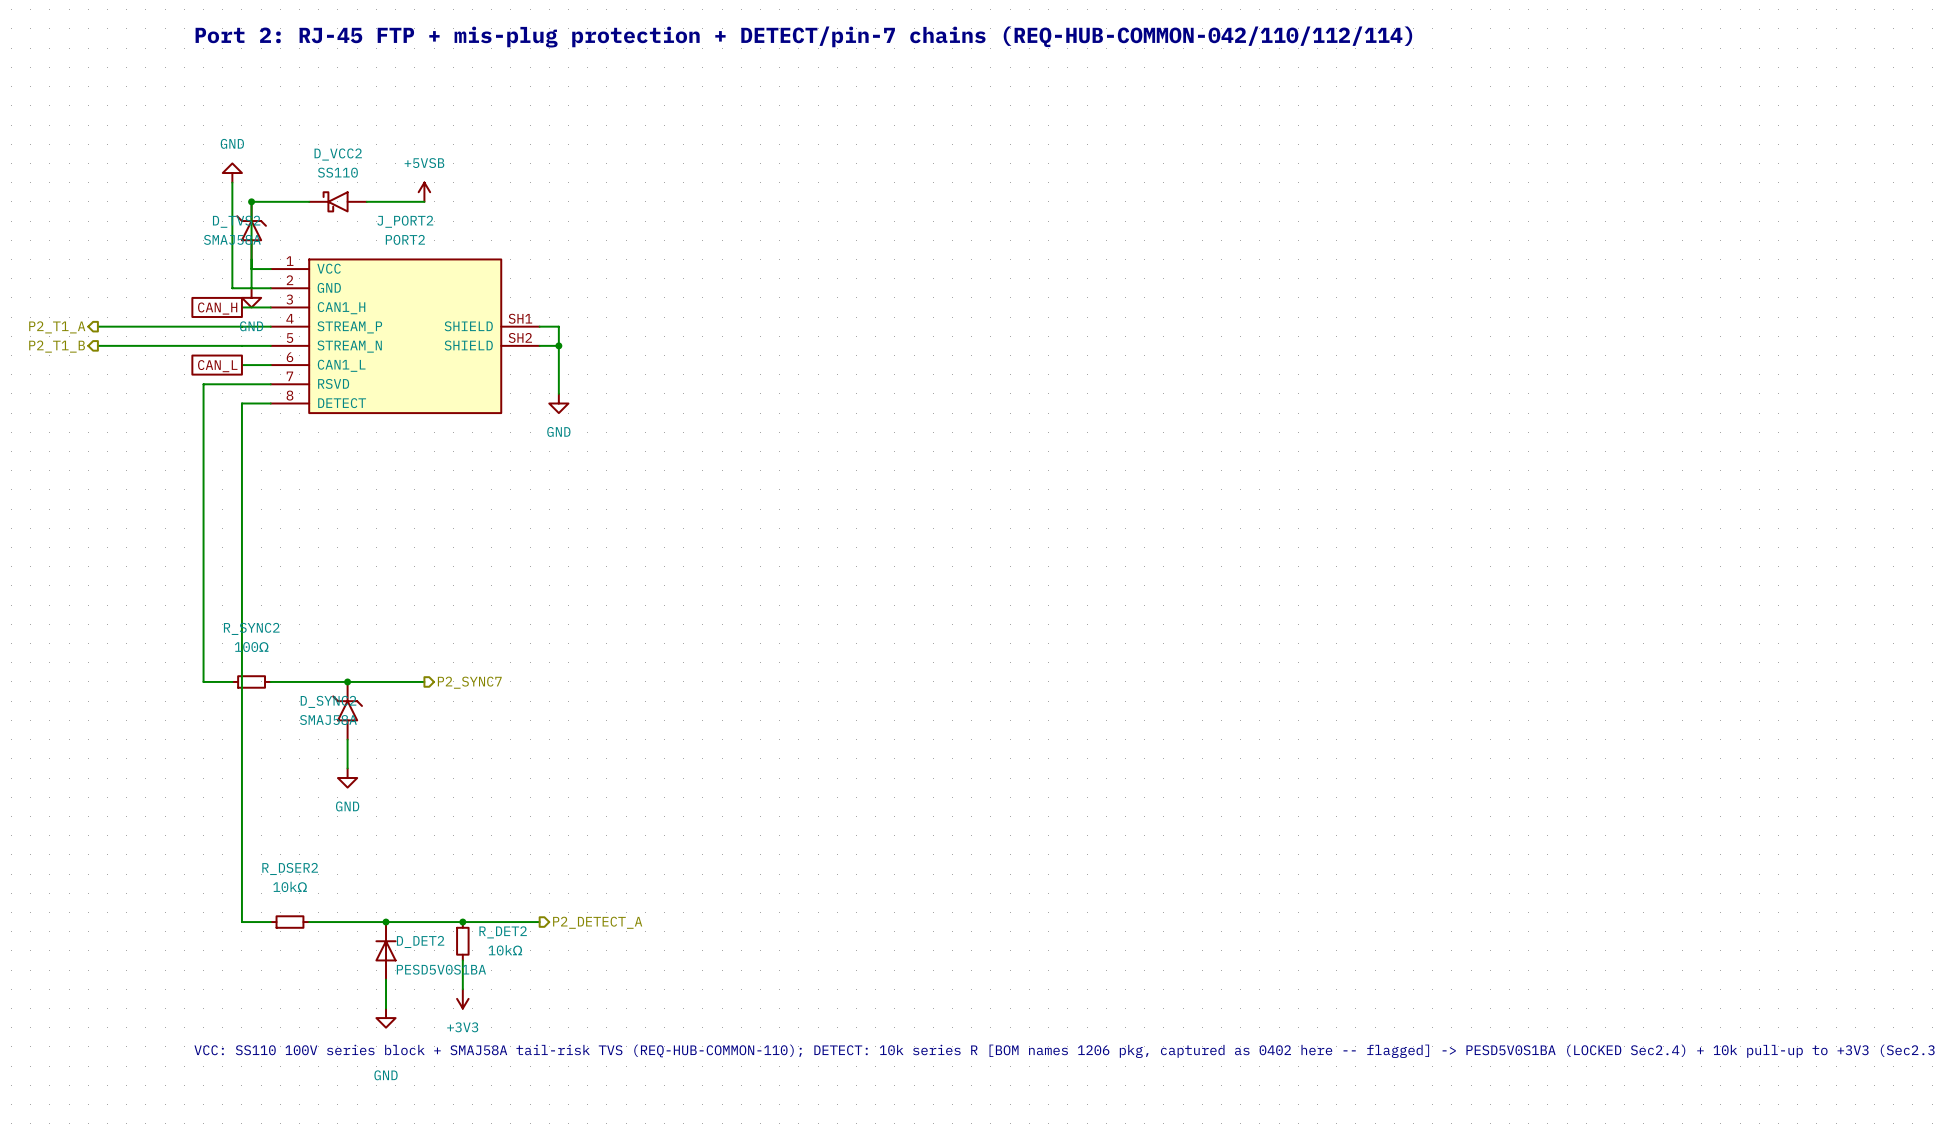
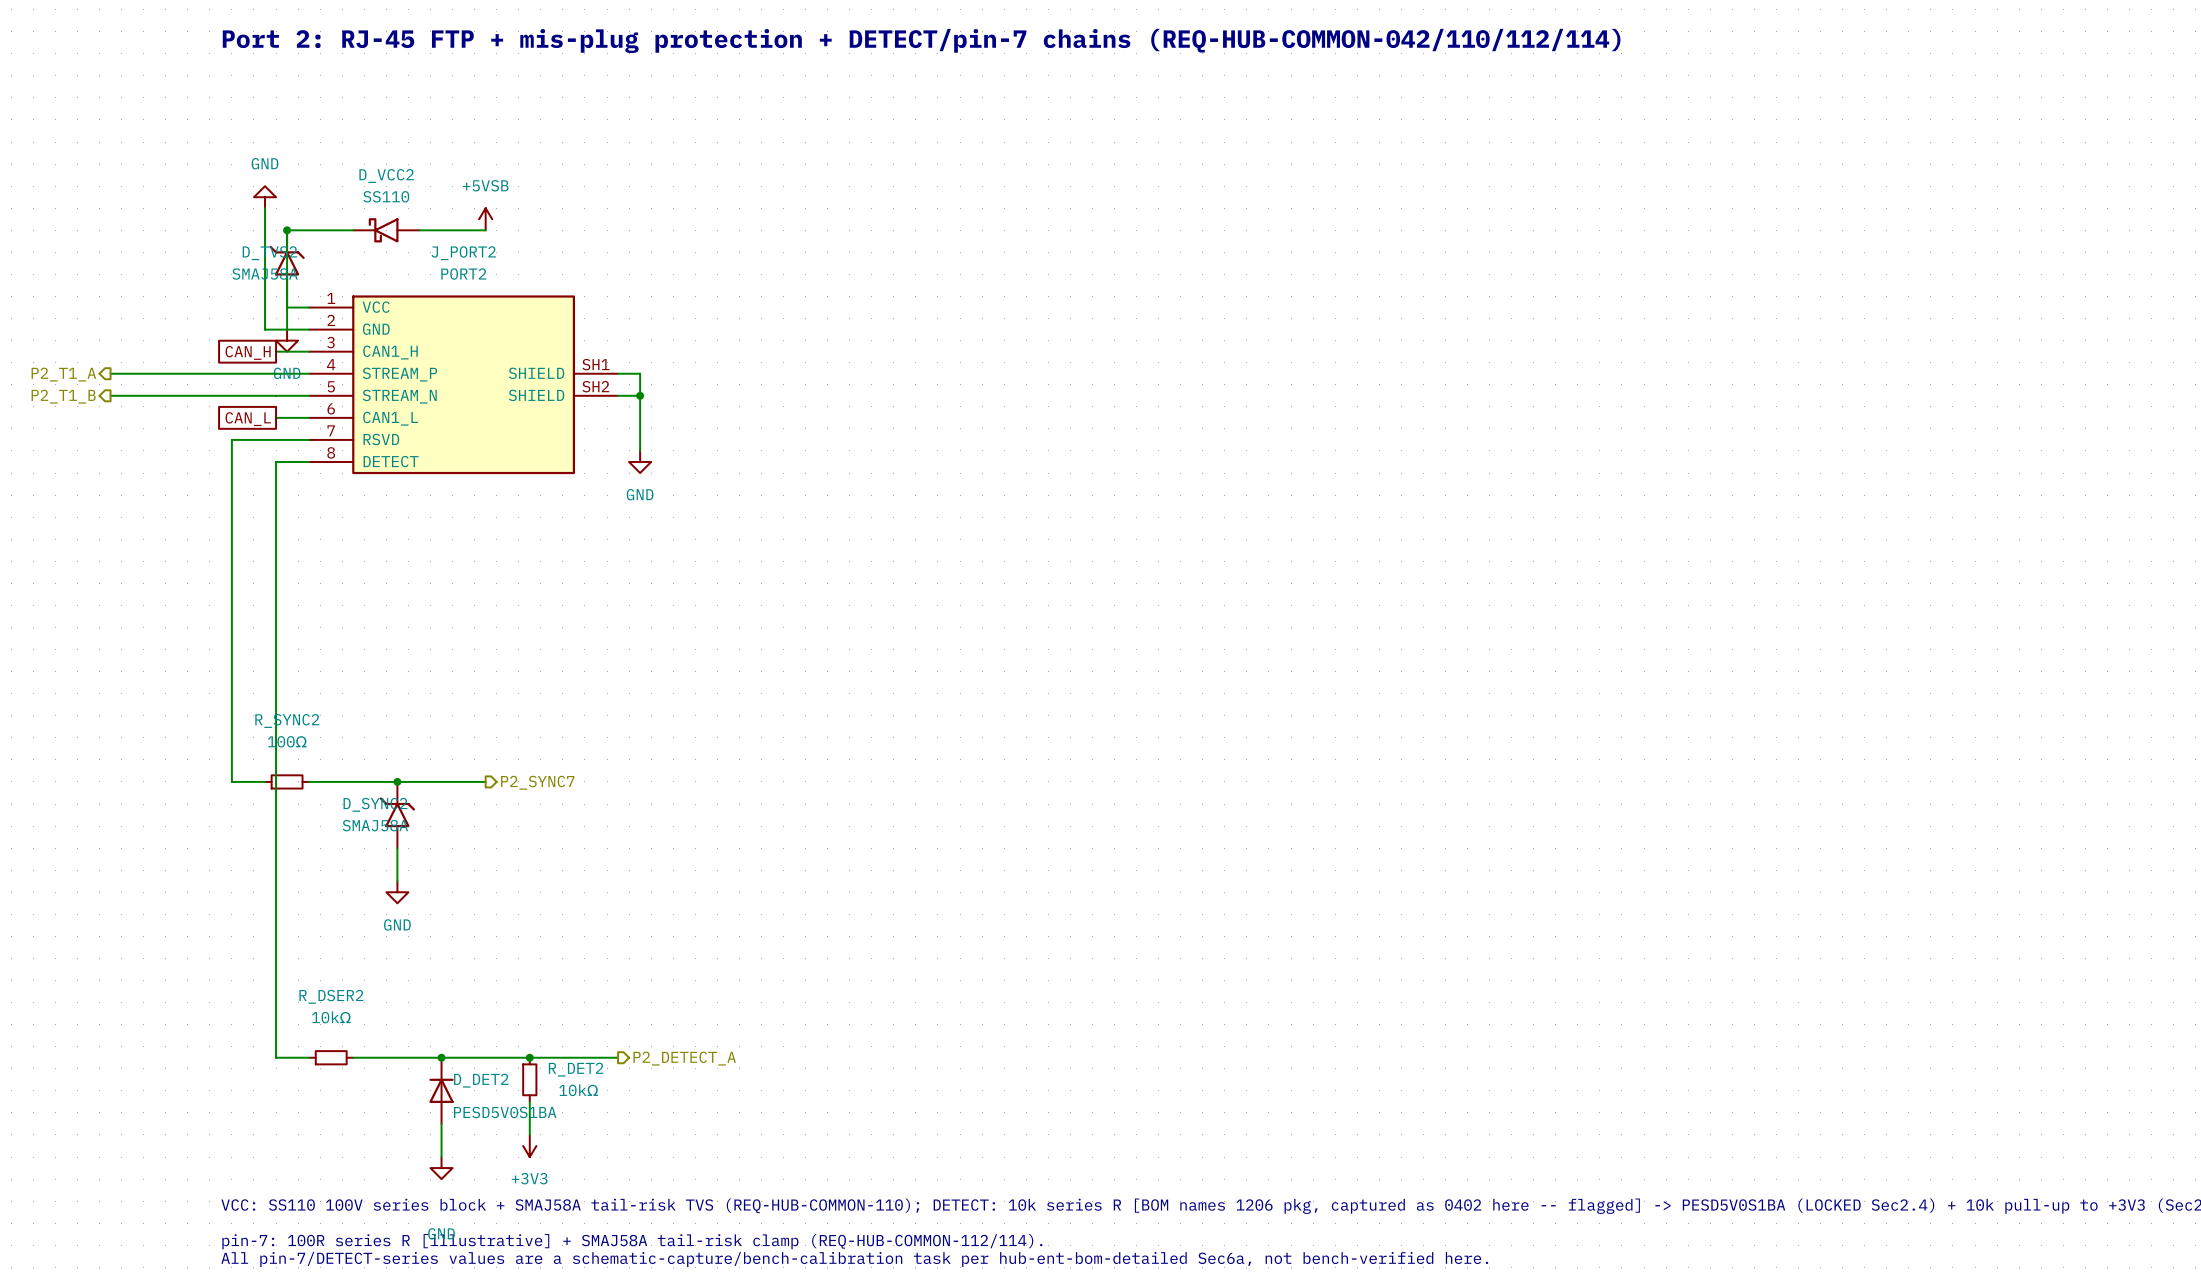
text: none -> pin-7: 100R series R [illustrative] + SMAJ58A tail-risk clamp (REQ-HUB-COMMON-112/114). (632, 1241)
text: none -> All pin-7/DETECT-series values are a schematic-capture/bench-calibration task per hub-ent-bom-detailed Sec6a, not bench-verified here. (854, 1259)

